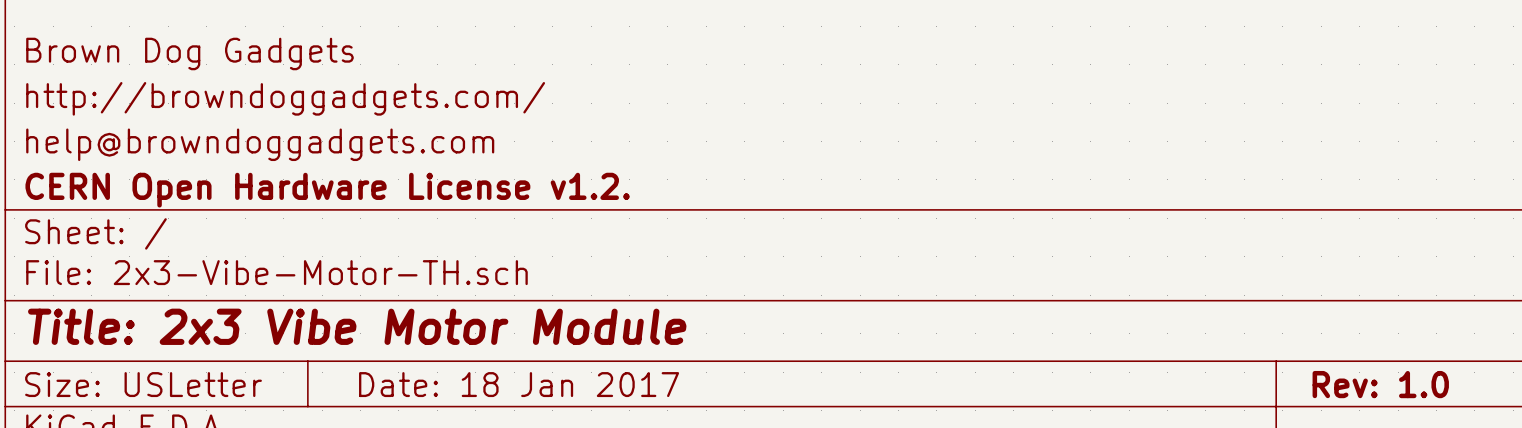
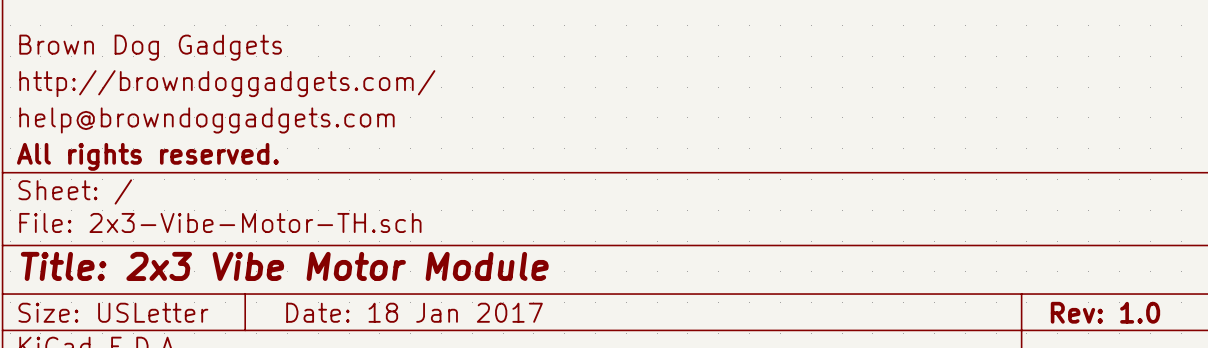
title block: CERN Open Hardware License v1.2. (327, 190) -> All rights reserved. (147, 156)

